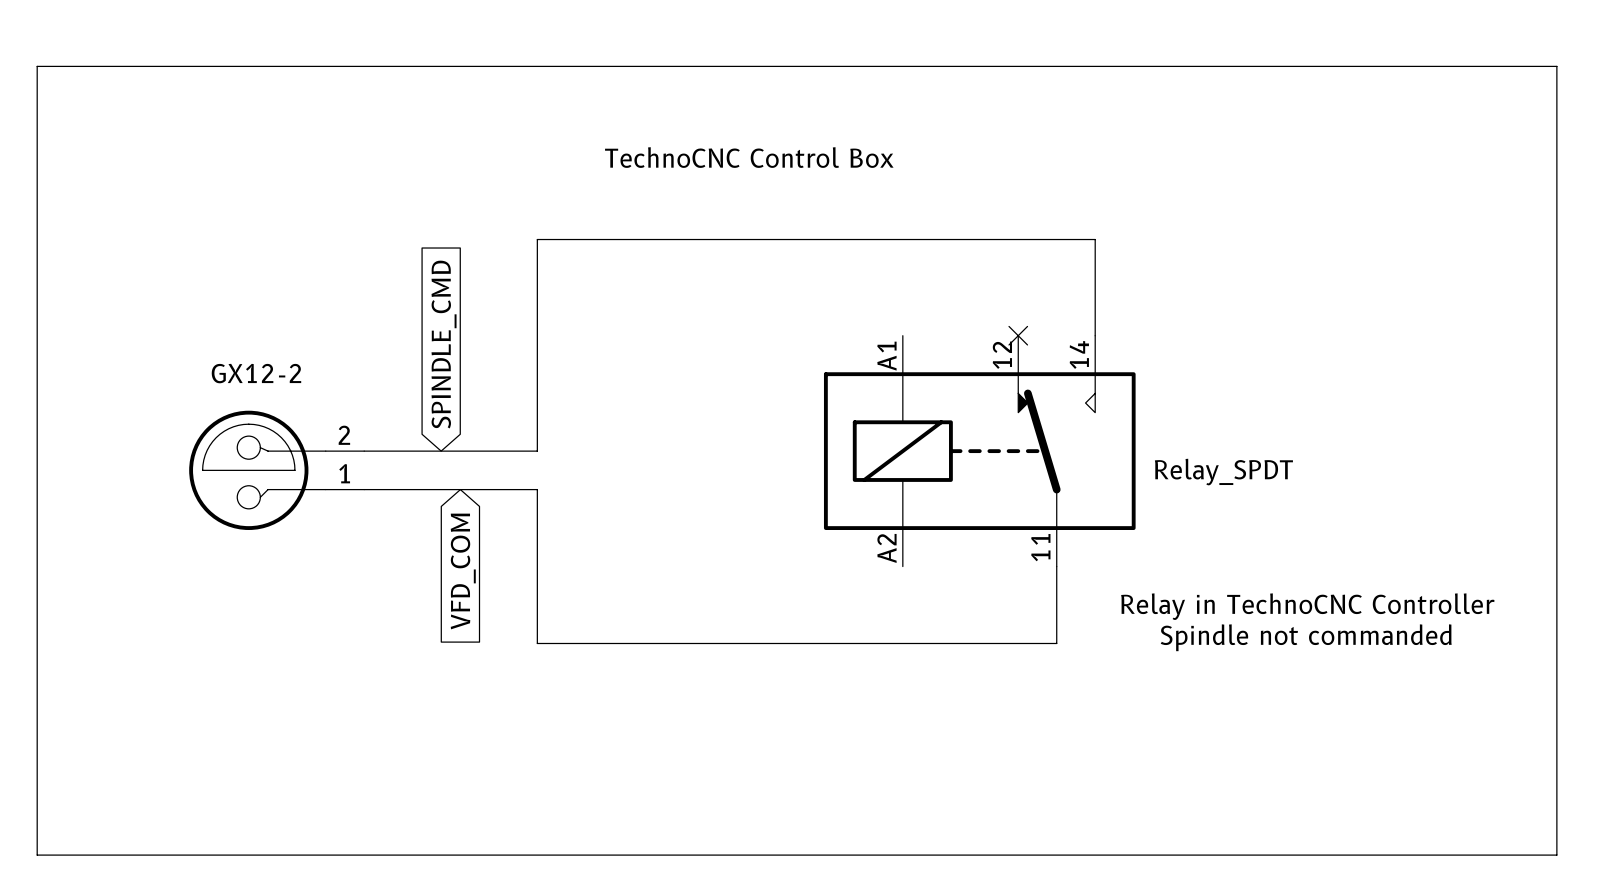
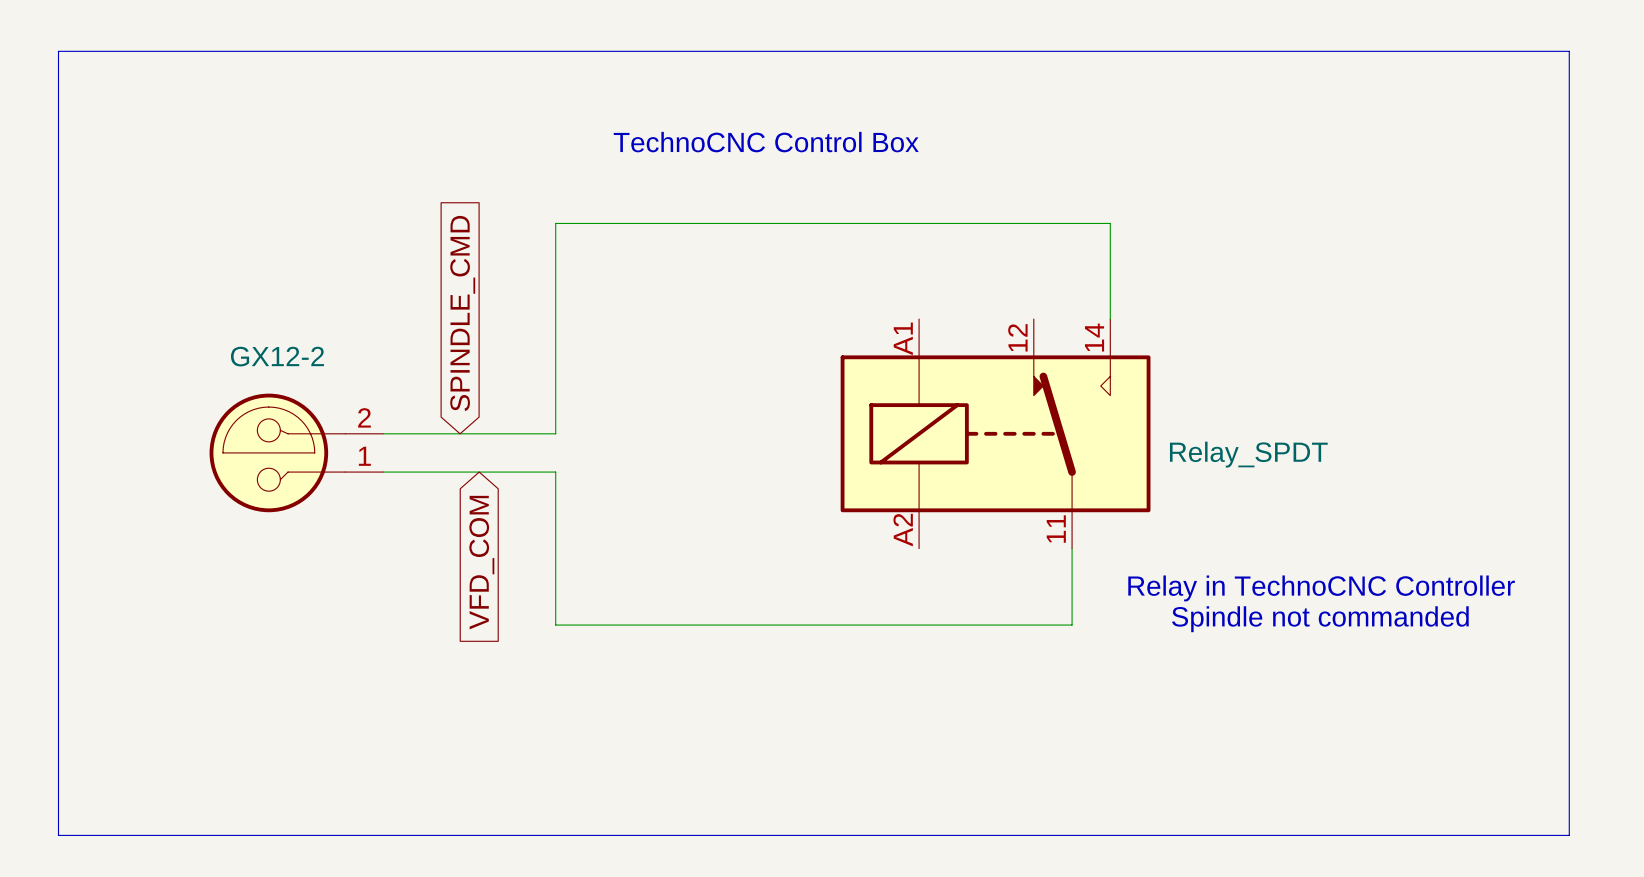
no-connect mark: (1018, 335) -> none

